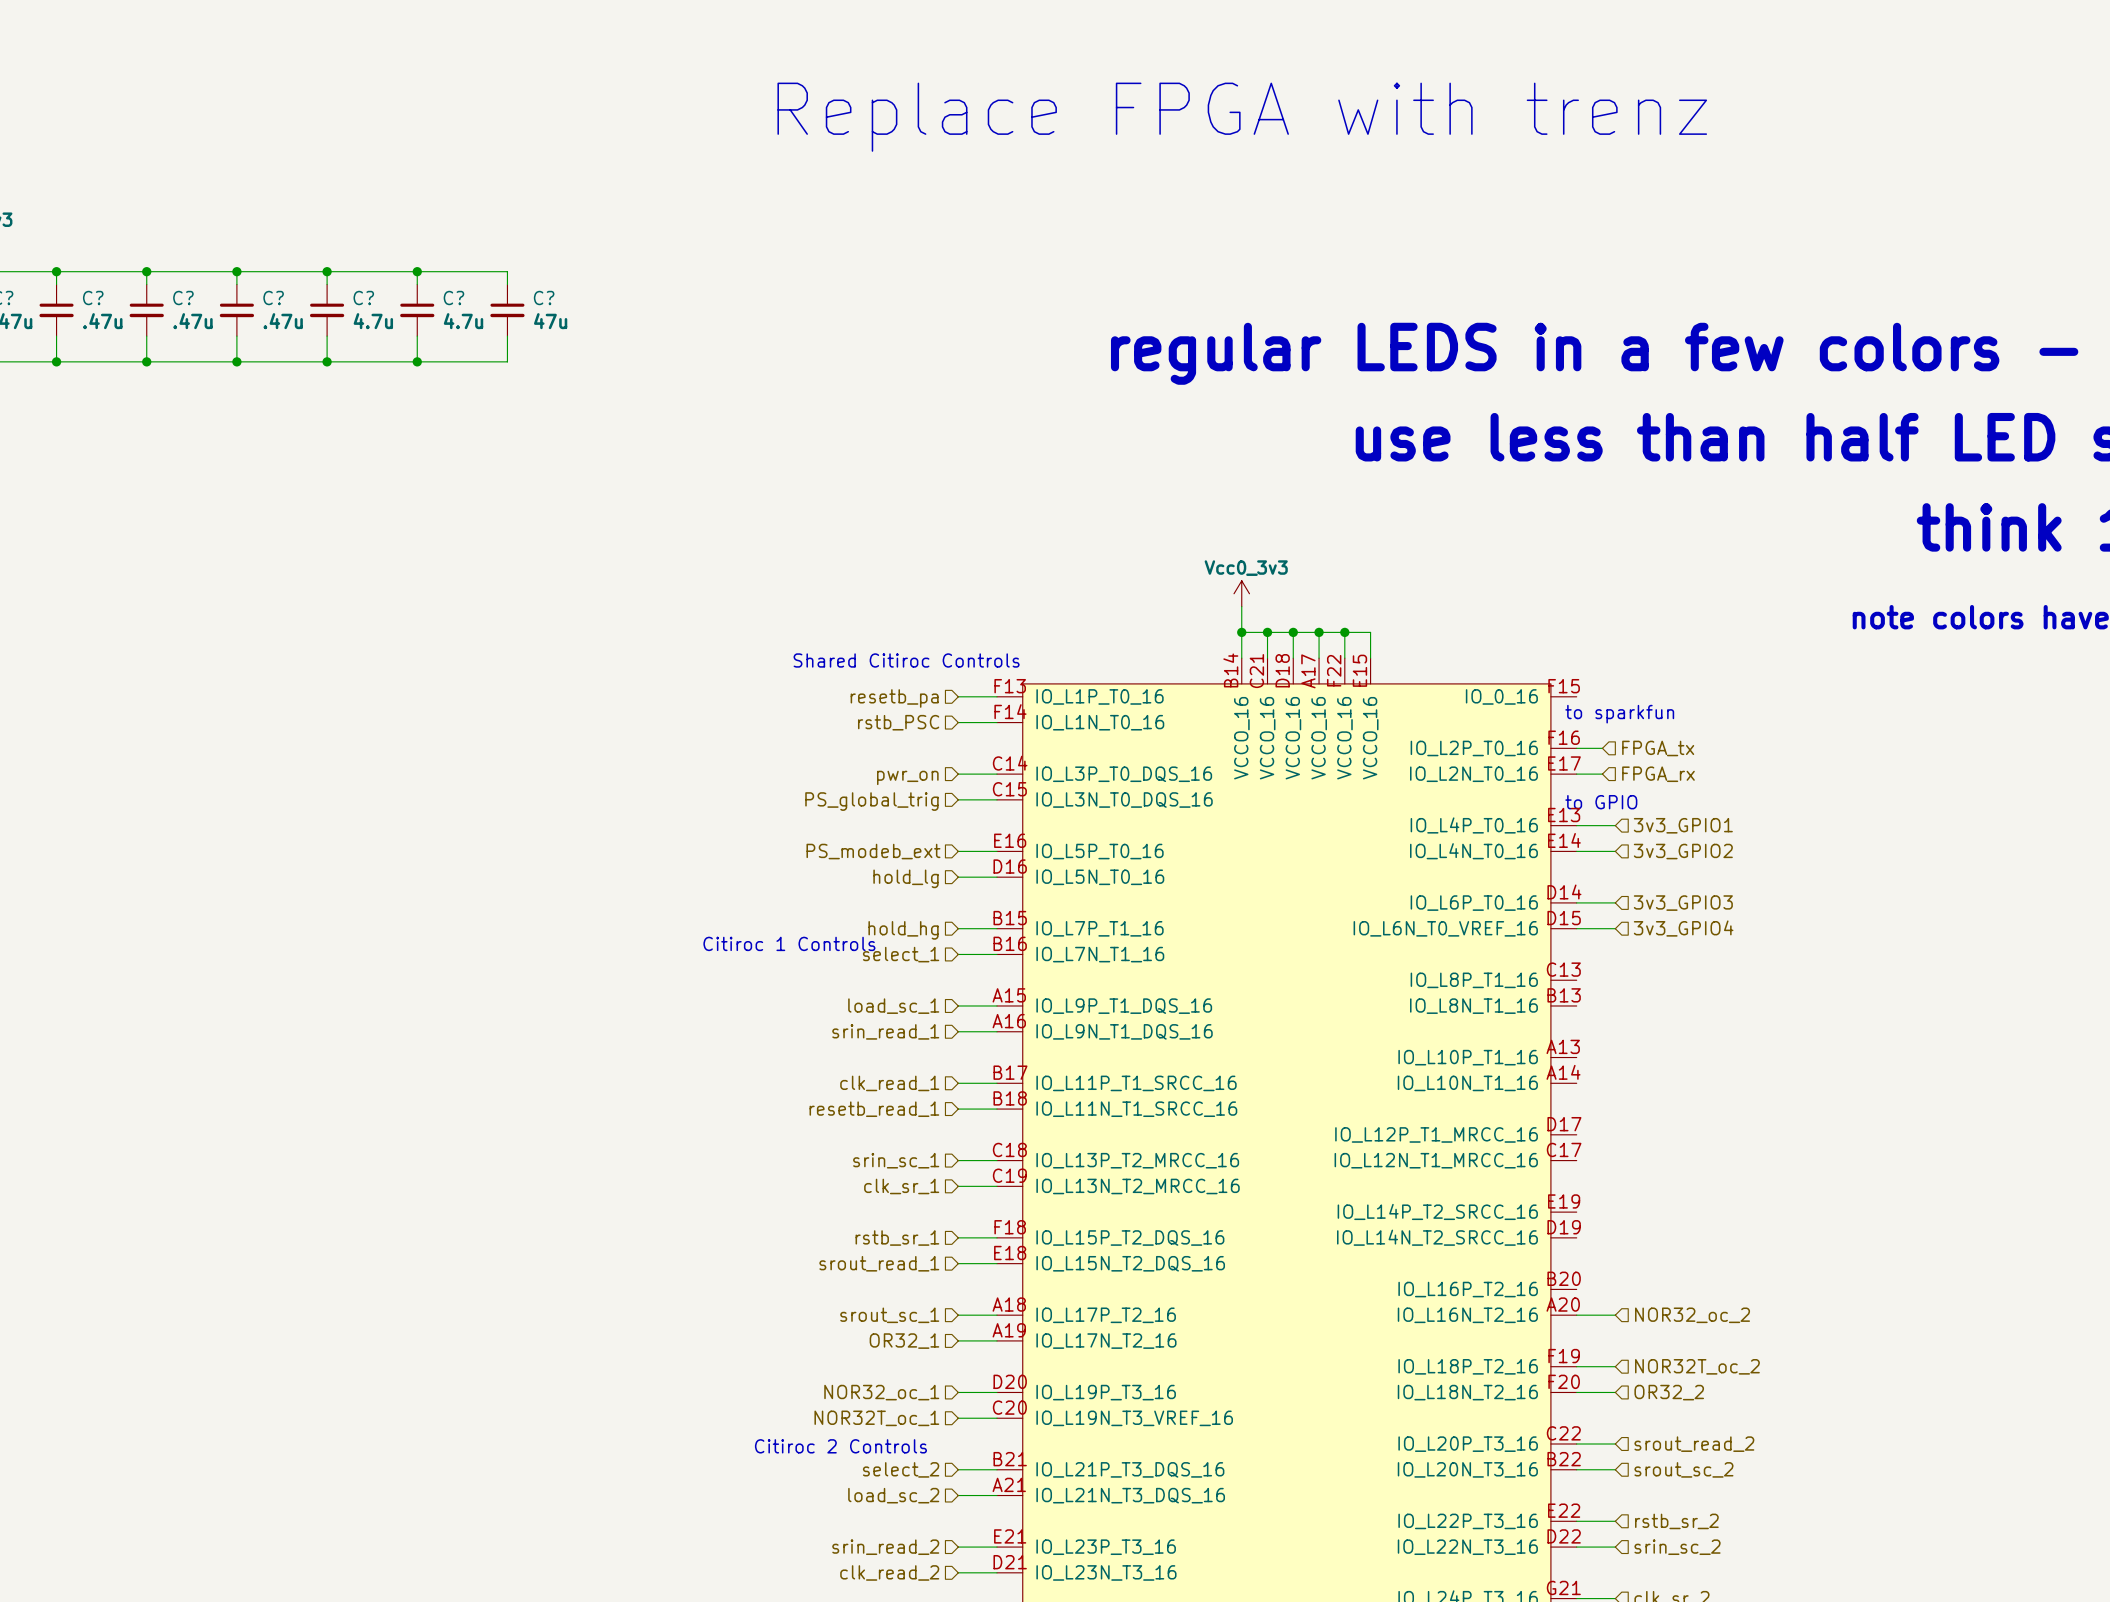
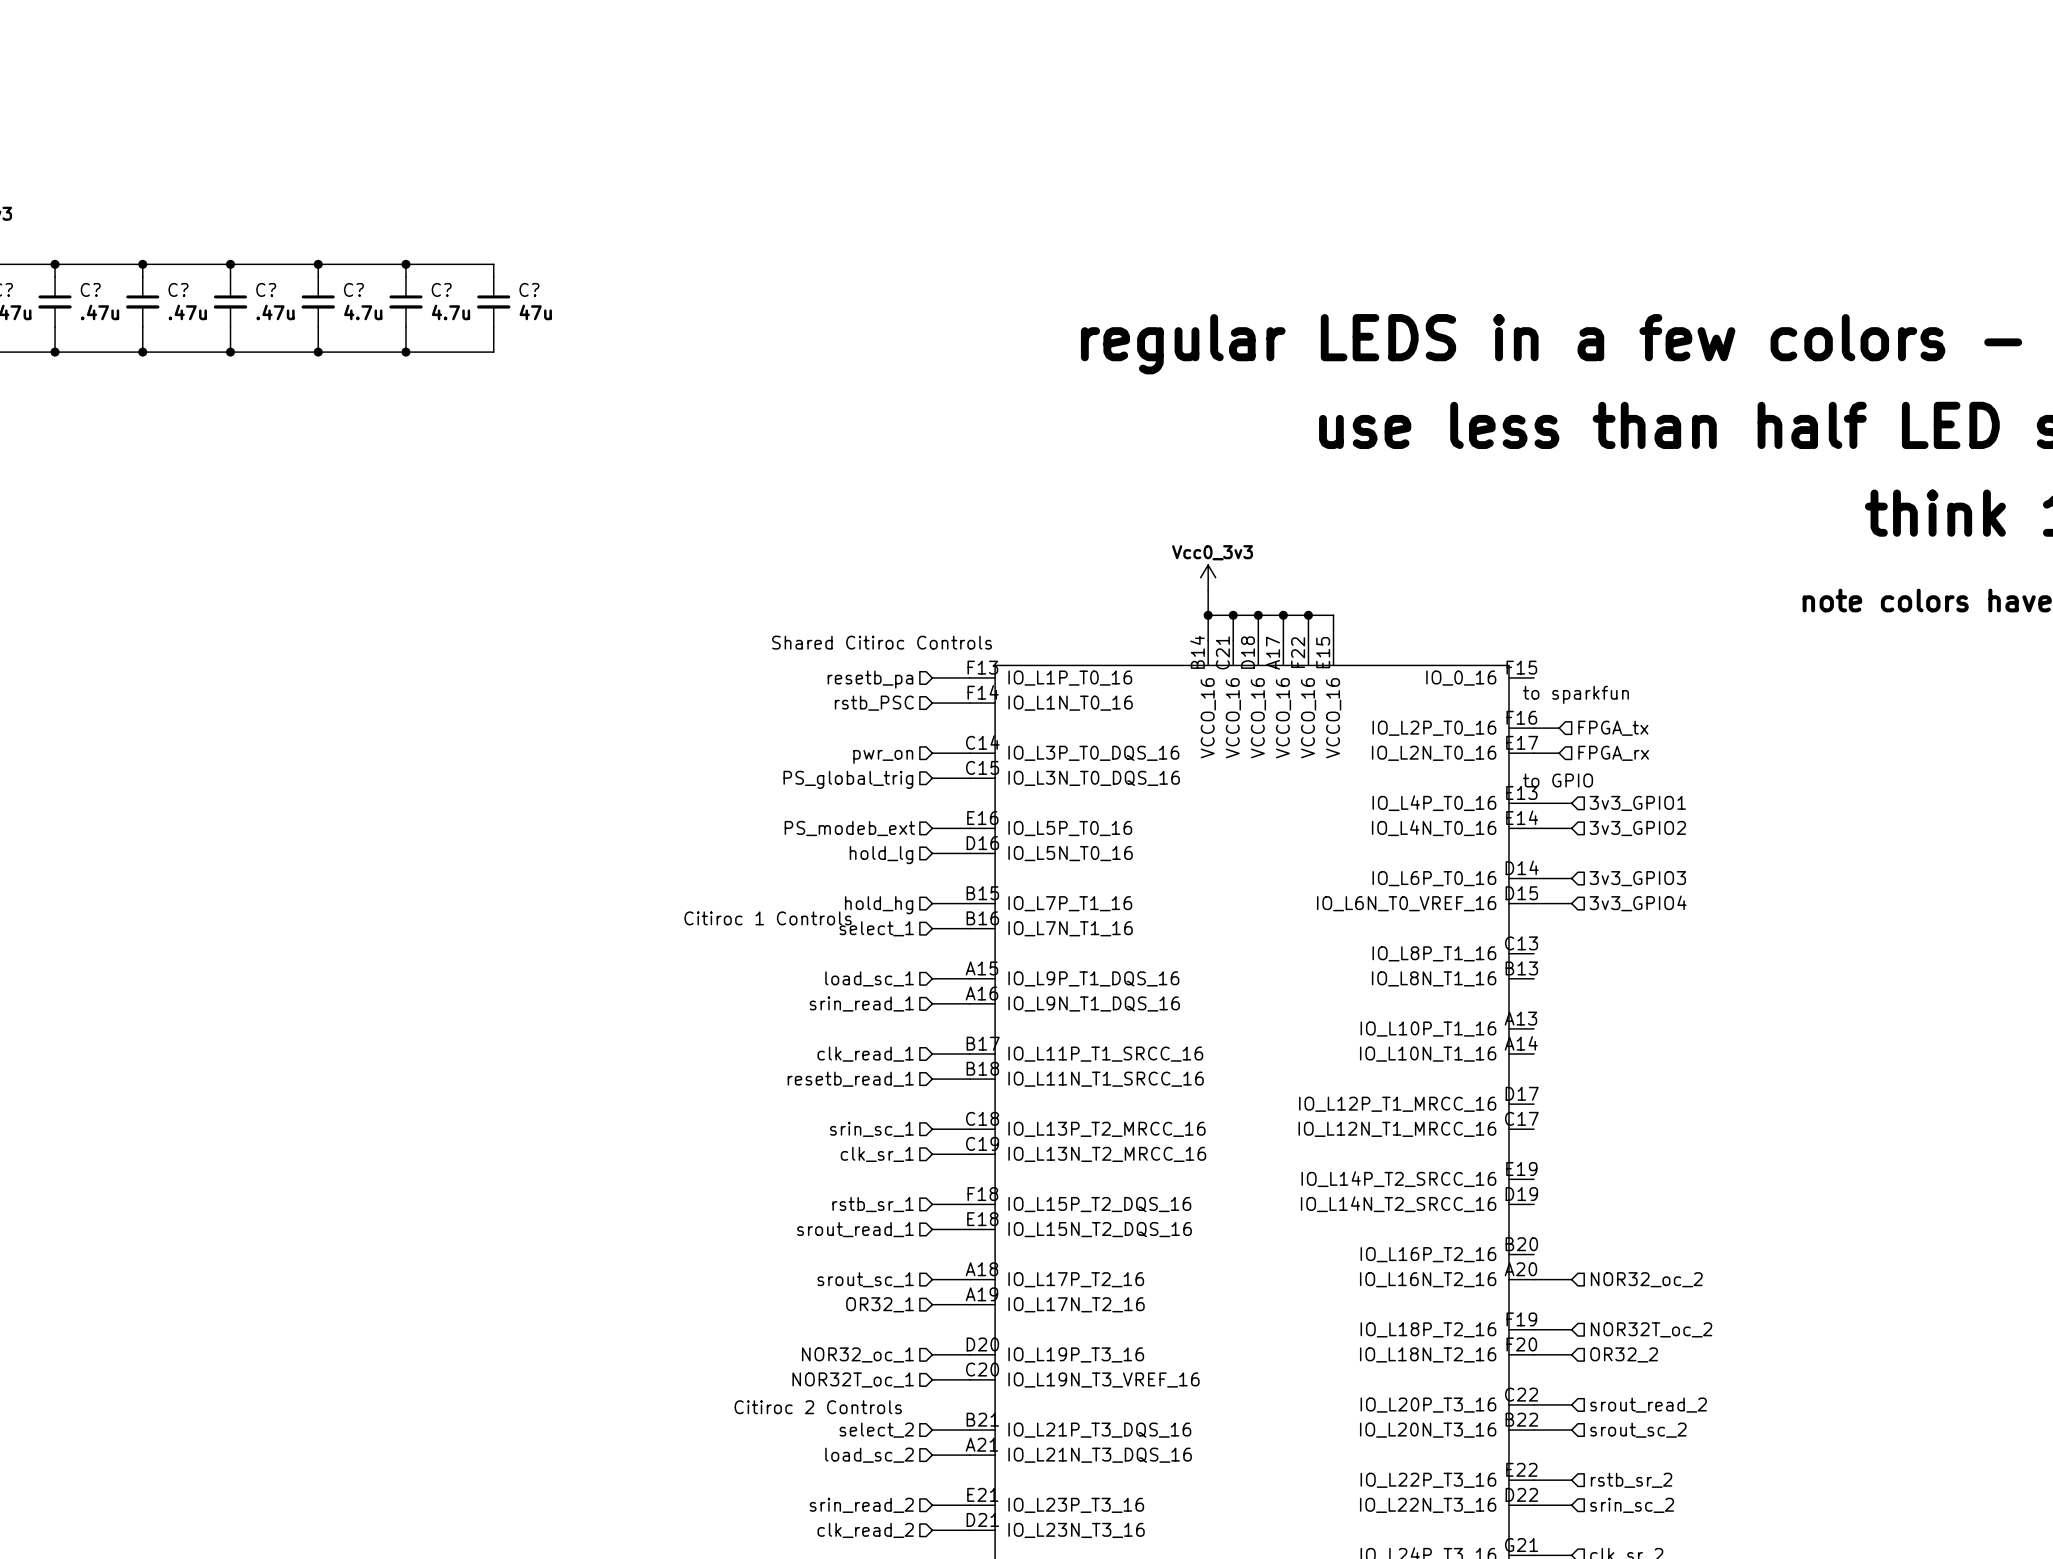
text: Replace FPGA with trenz (1242, 117) -> none

